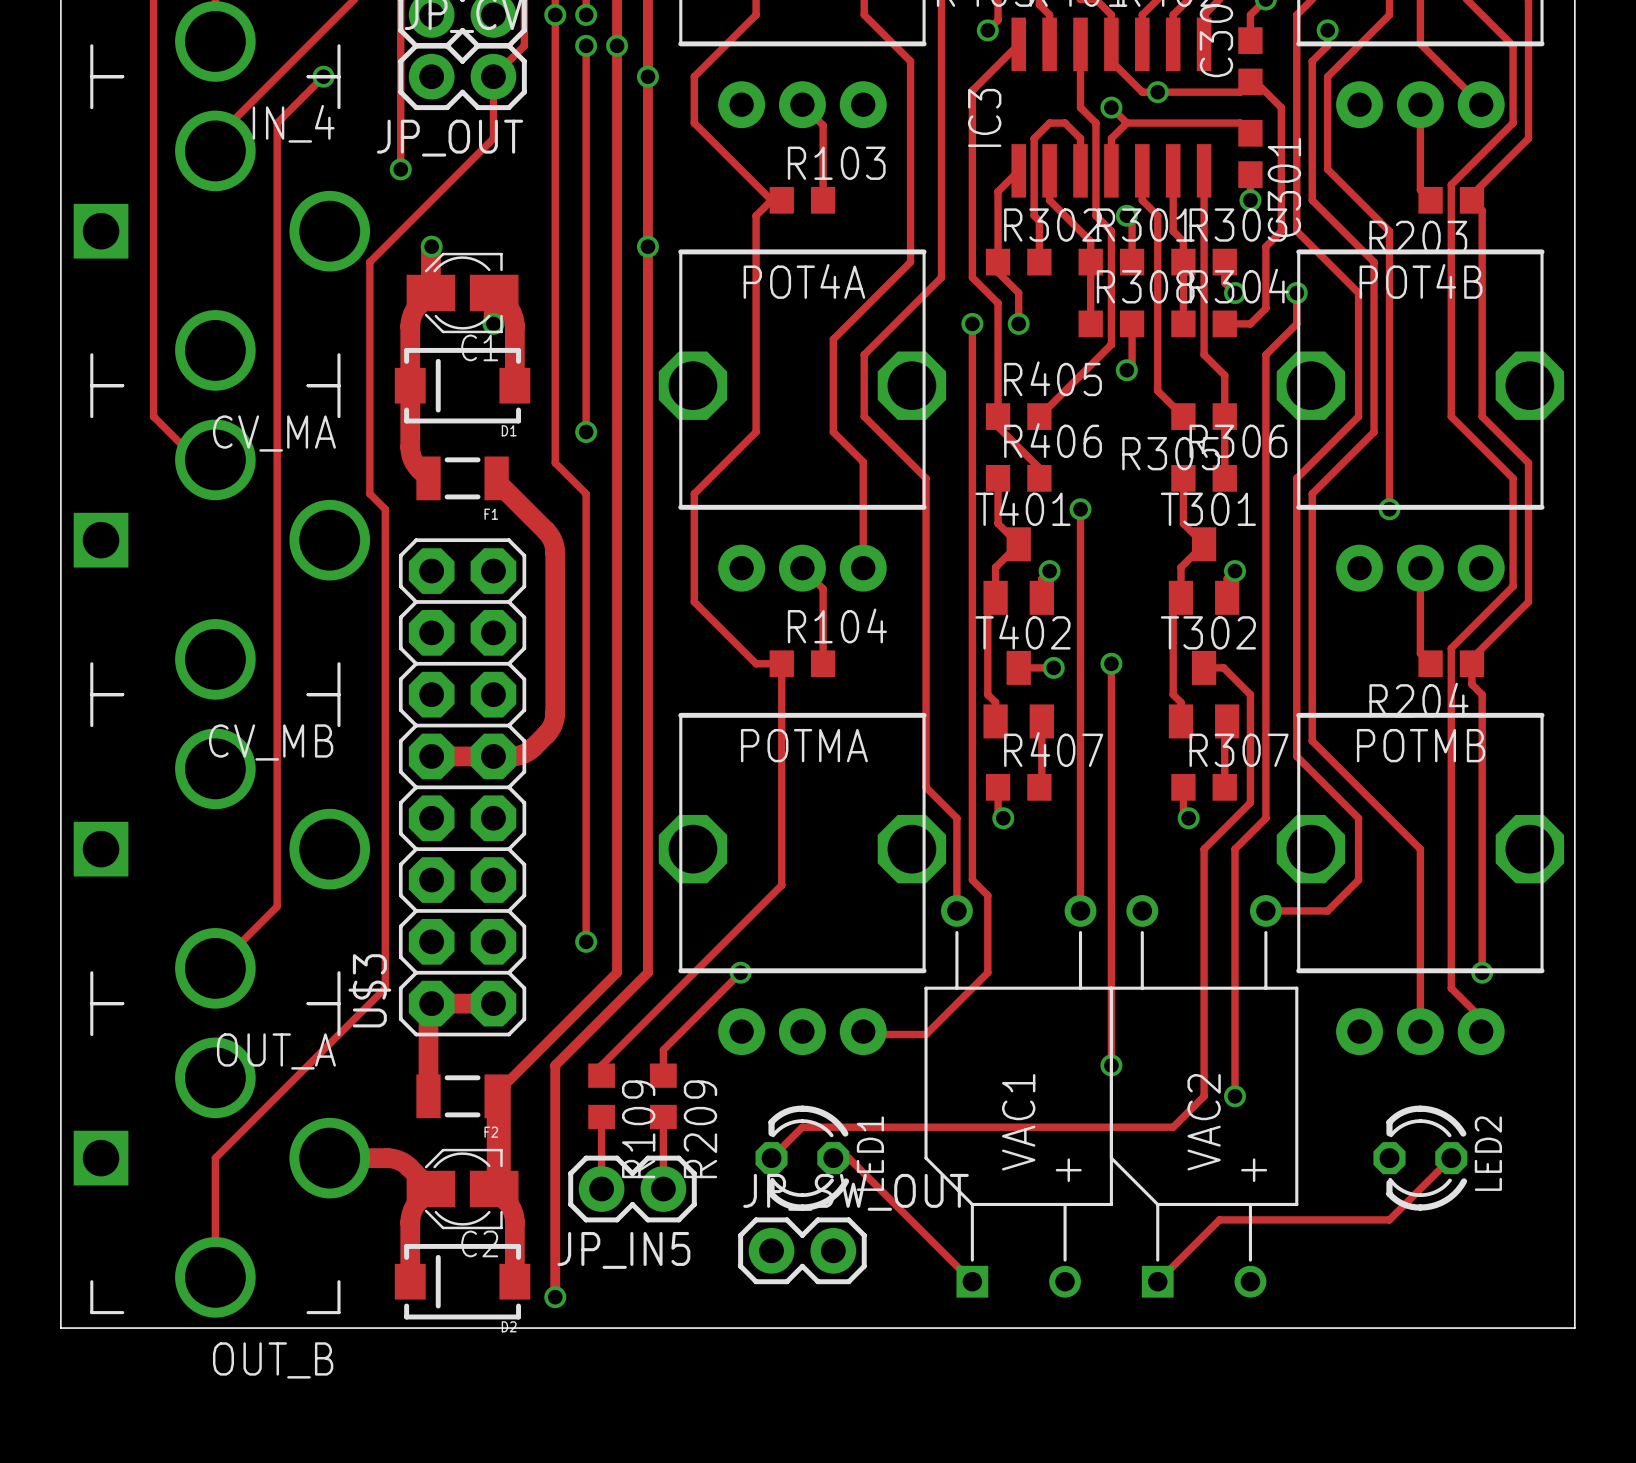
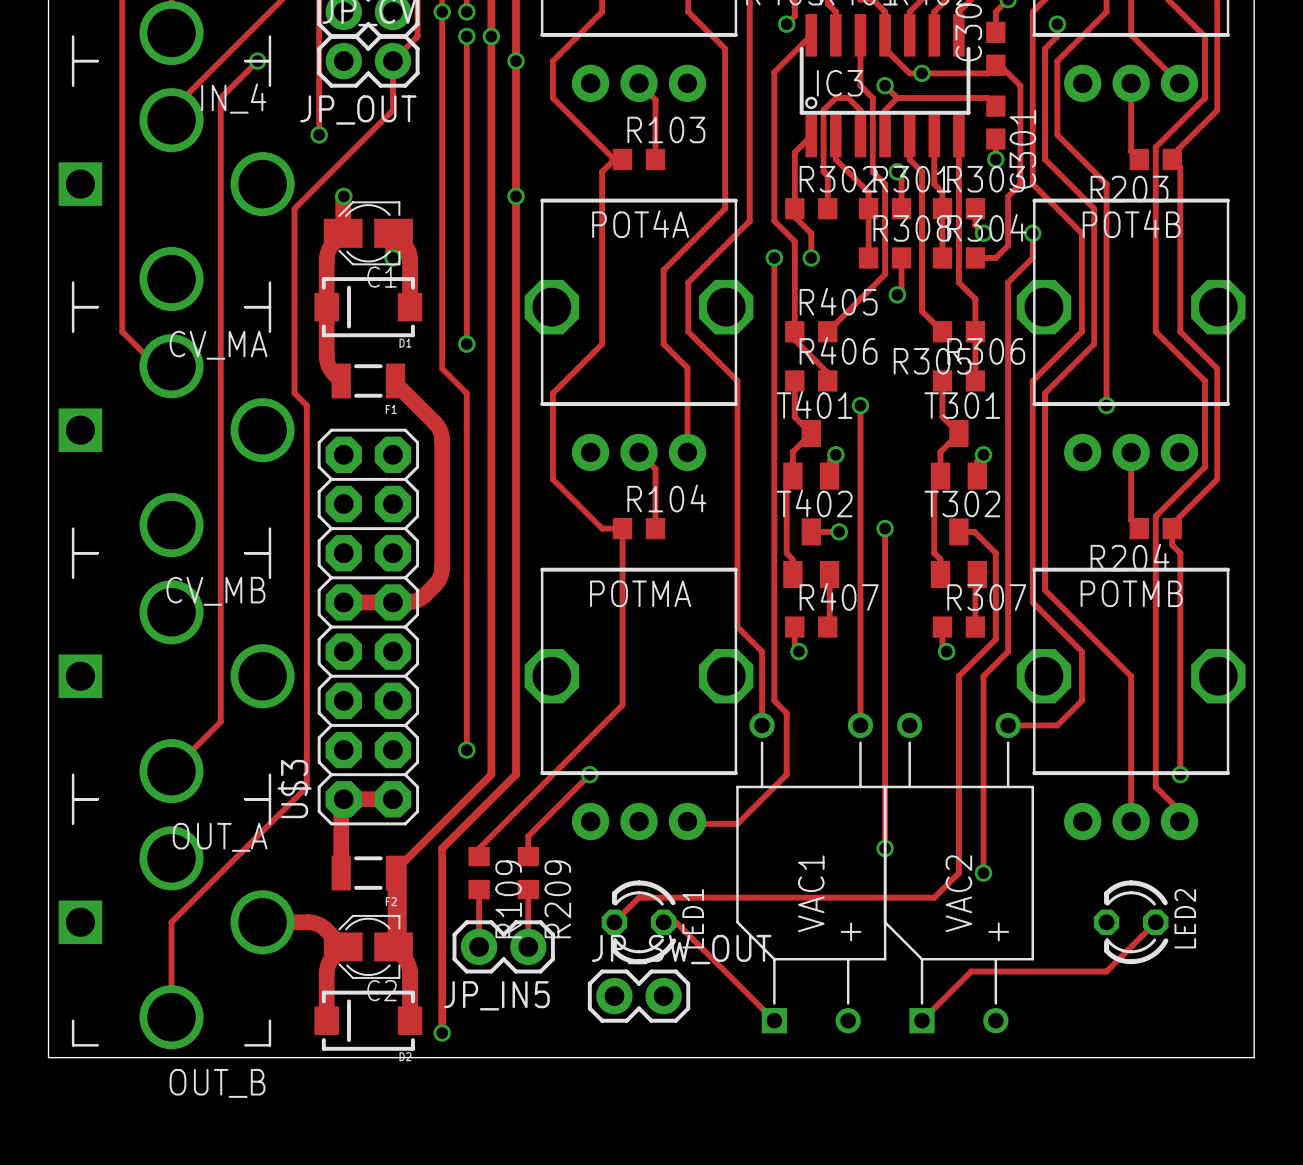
IC3 footprint: [1011, 17, 1212, 198] -> [799, 14, 971, 158]
IC3 name position: IC3 (984, 117) -> IC3 (839, 83)

